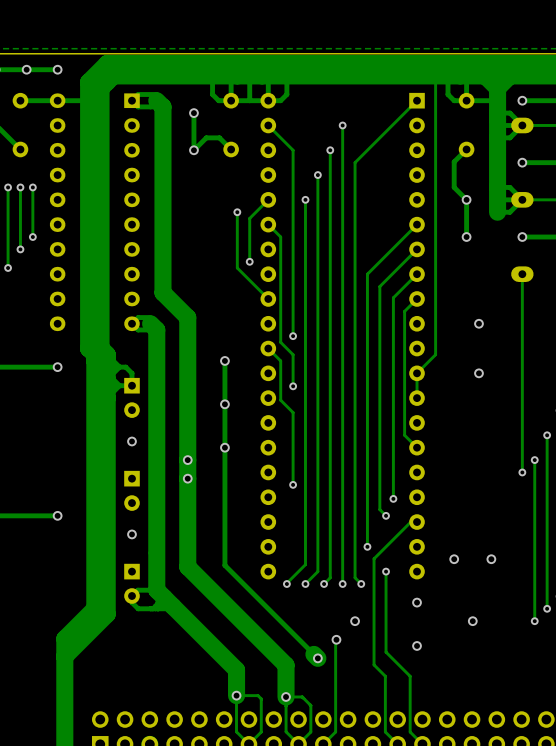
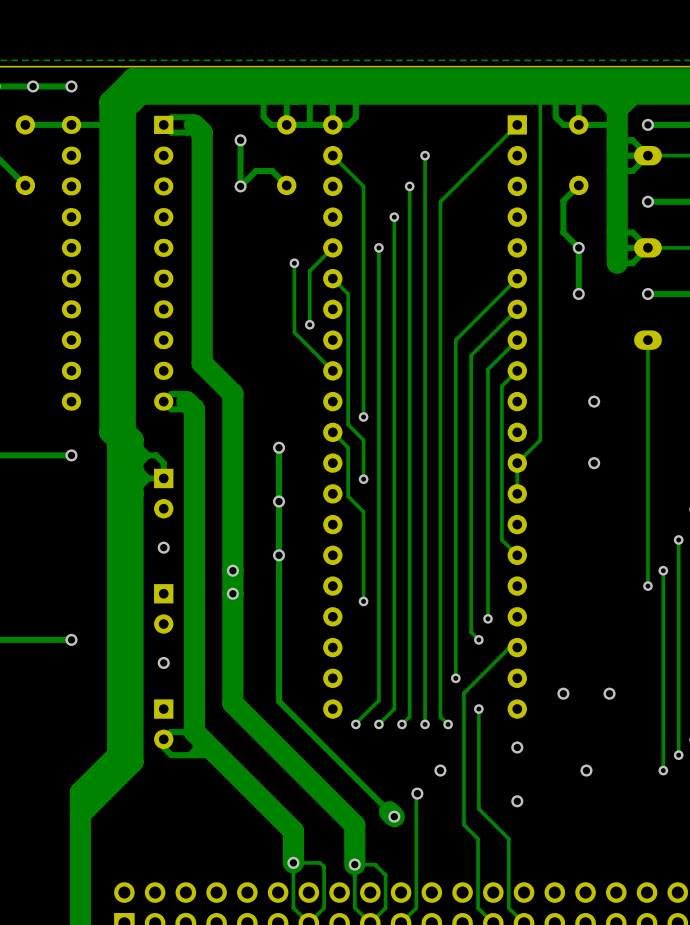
track: (8, 187) (8, 267) -> none
via: (8, 187) -> none
track: (20, 187) (20, 249) -> none
via: (20, 187) -> none
track: (32, 187) (32, 237) -> none
via: (32, 187) -> none
via: (32, 237) -> none
via: (20, 249) -> none
via: (8, 267) -> none

